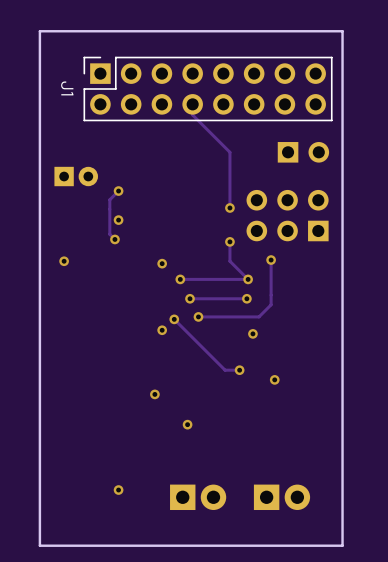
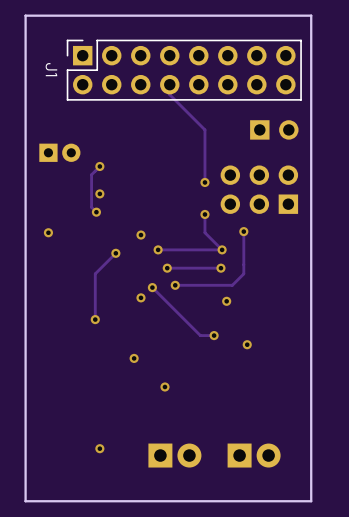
track: none -> (115, 253) (95, 273) (95, 319)
via: none -> (115, 253)
via: none -> (95, 319)

